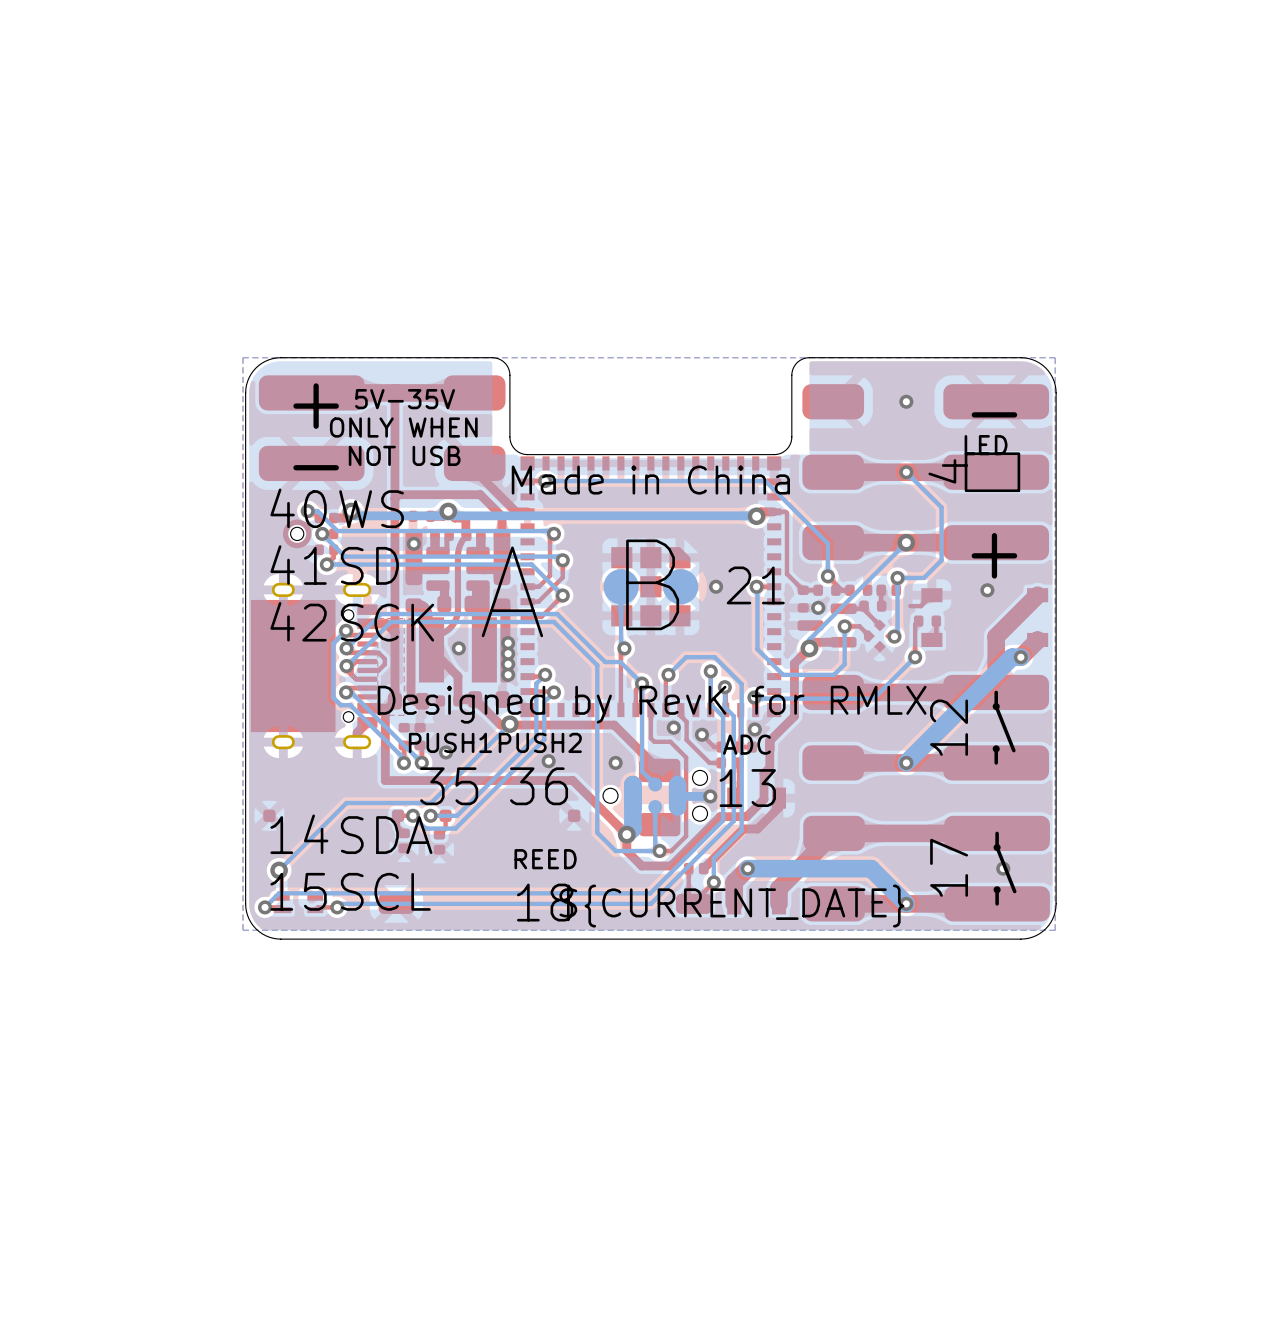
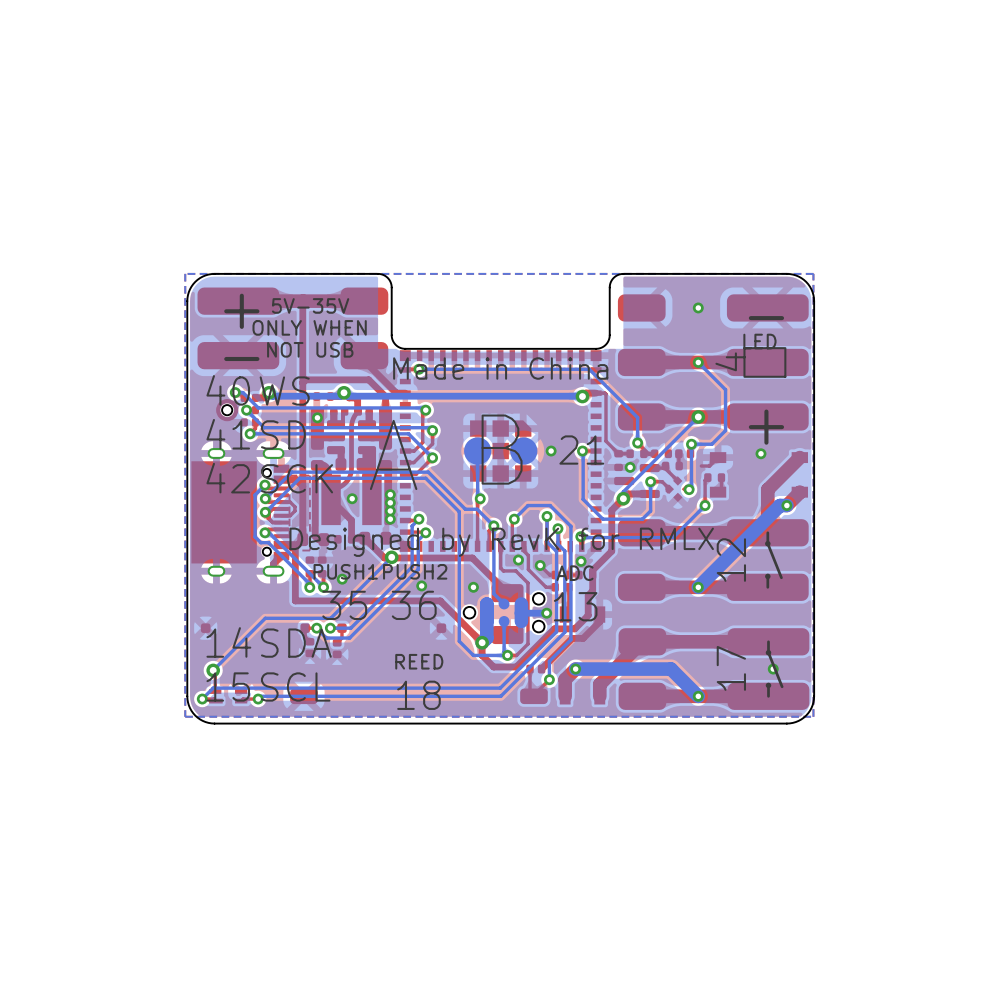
text: ${CURRENT_DATE} (731, 906) -> none

